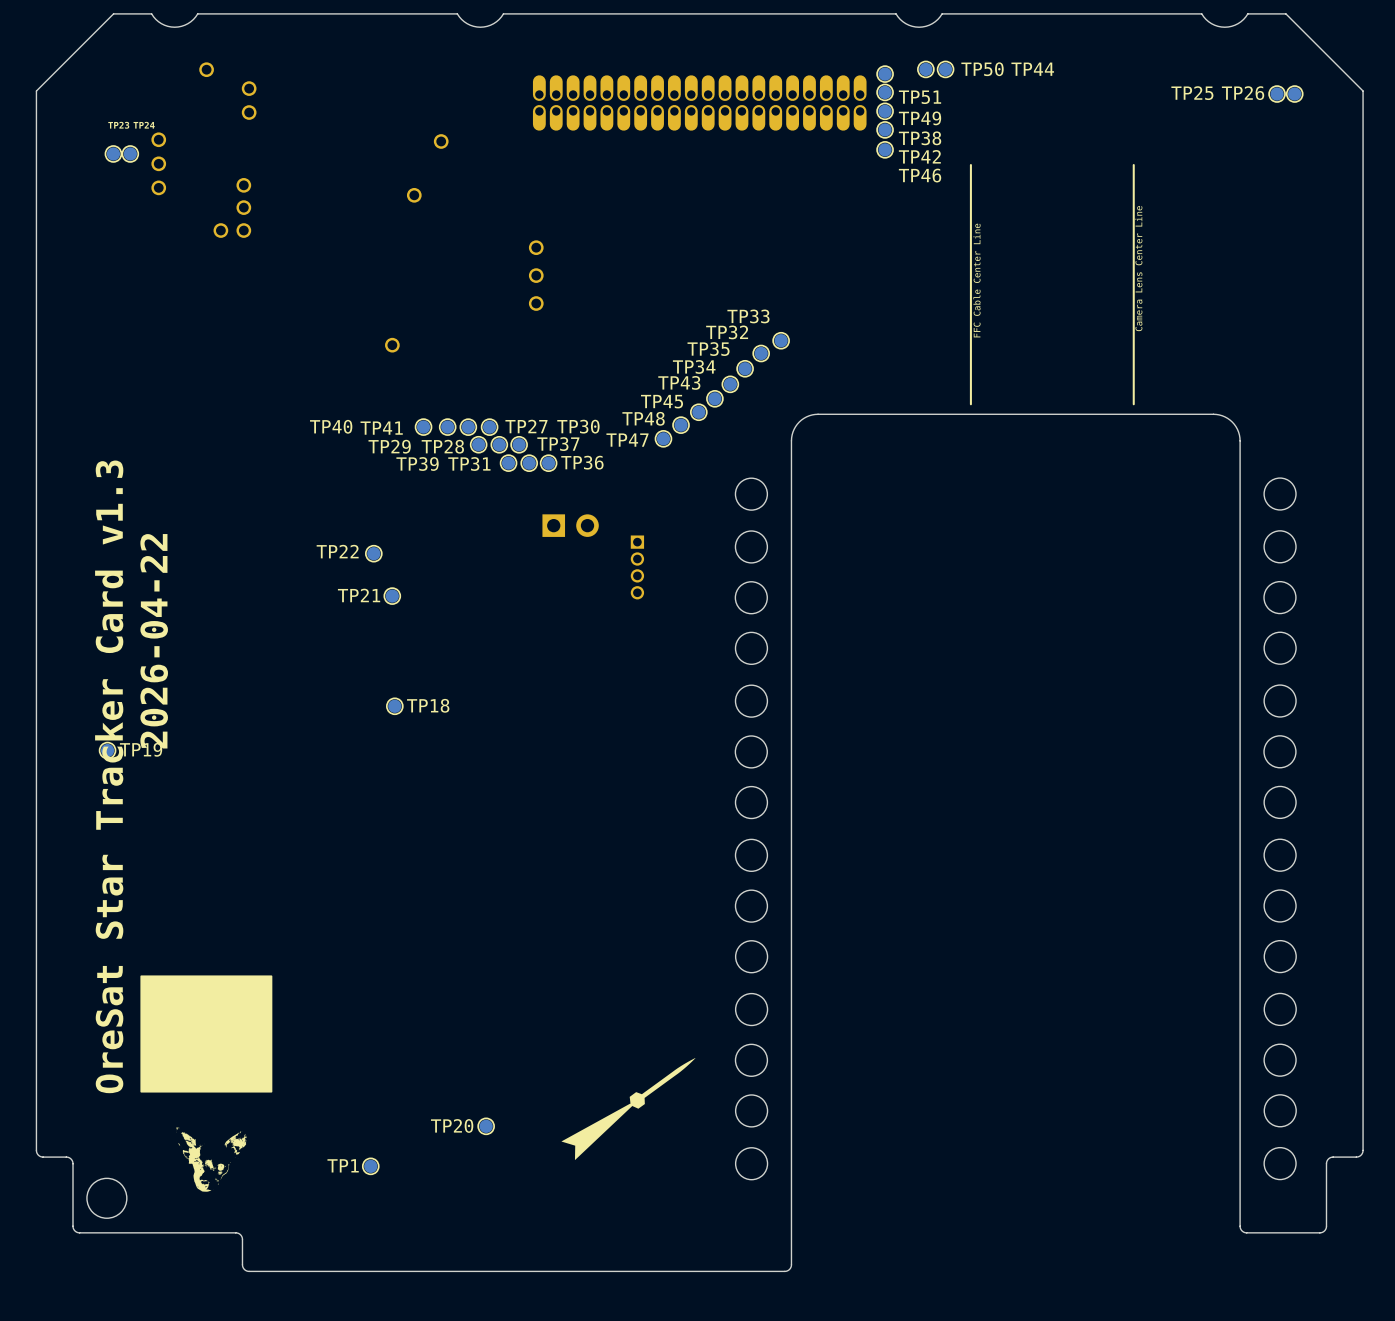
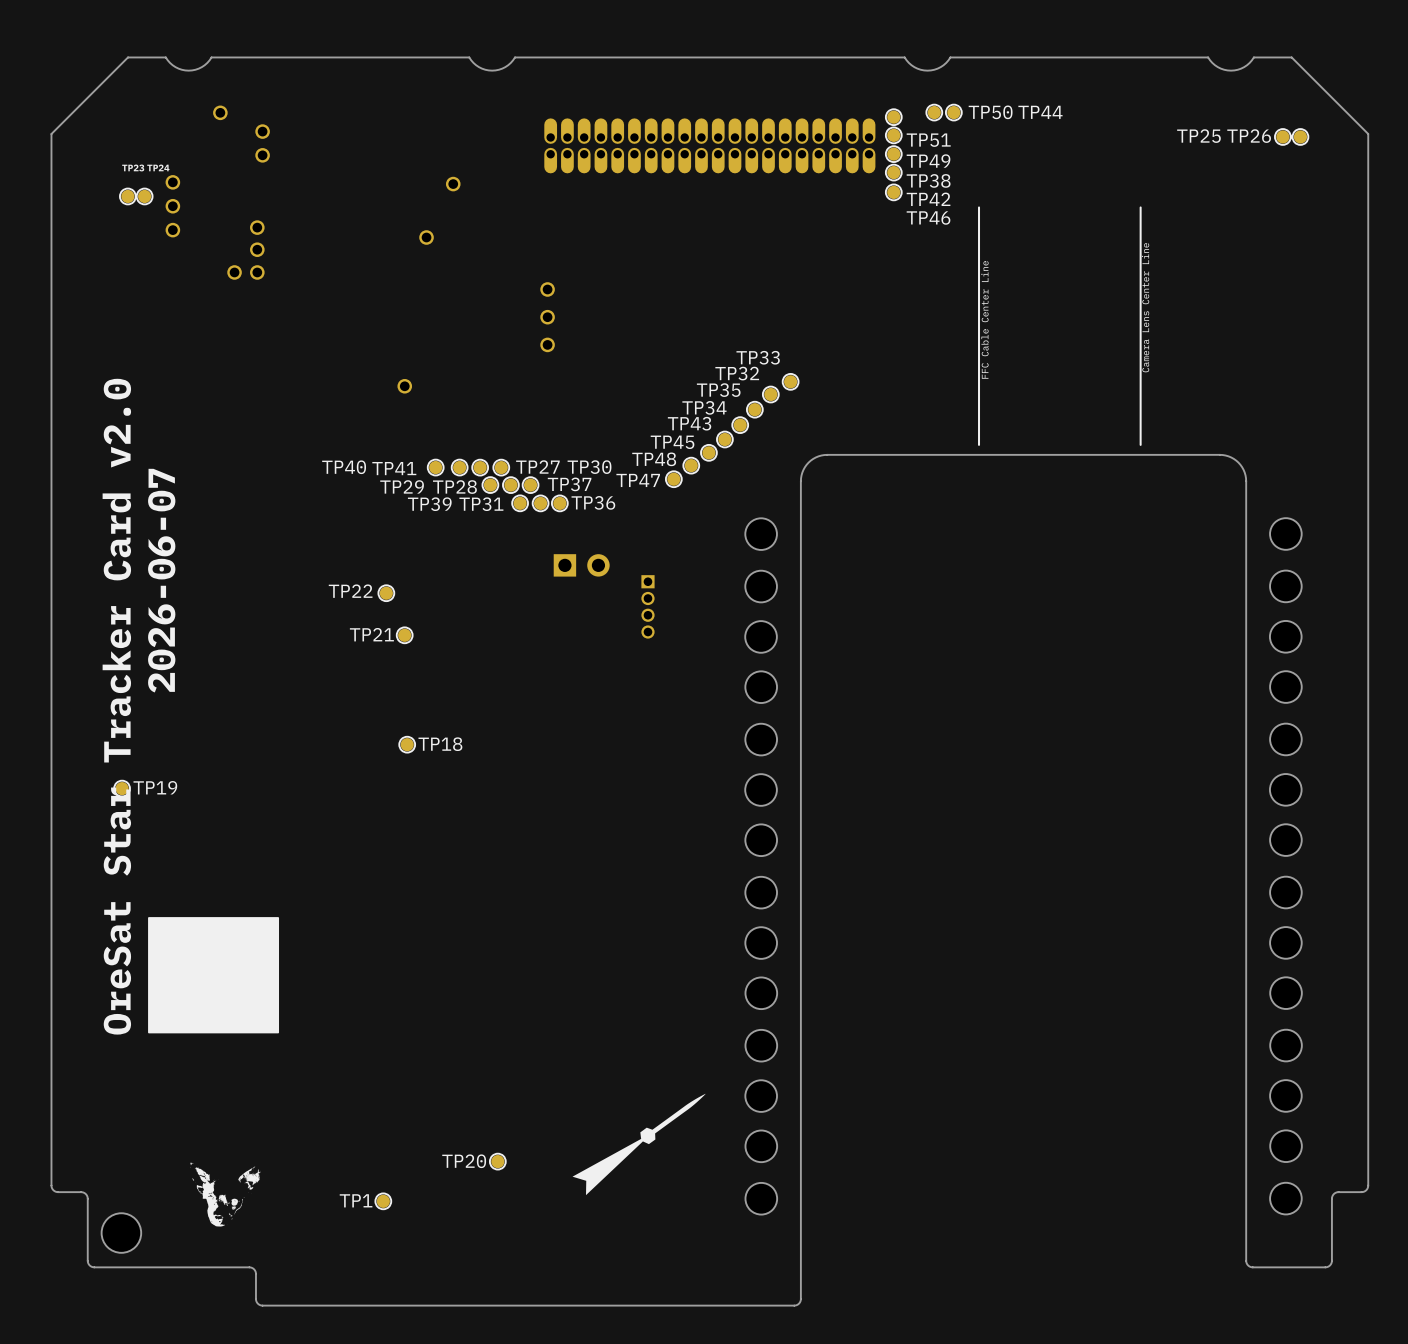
text: 2026-04-22 (154, 641) -> 2026-06-07 (161, 580)
text: OreSat Star Tracker Card v1.3 (109, 776) -> OreSat Star Tracker Card v2.0 (116, 706)
drawing position: (206, 1033) -> (213, 975)

